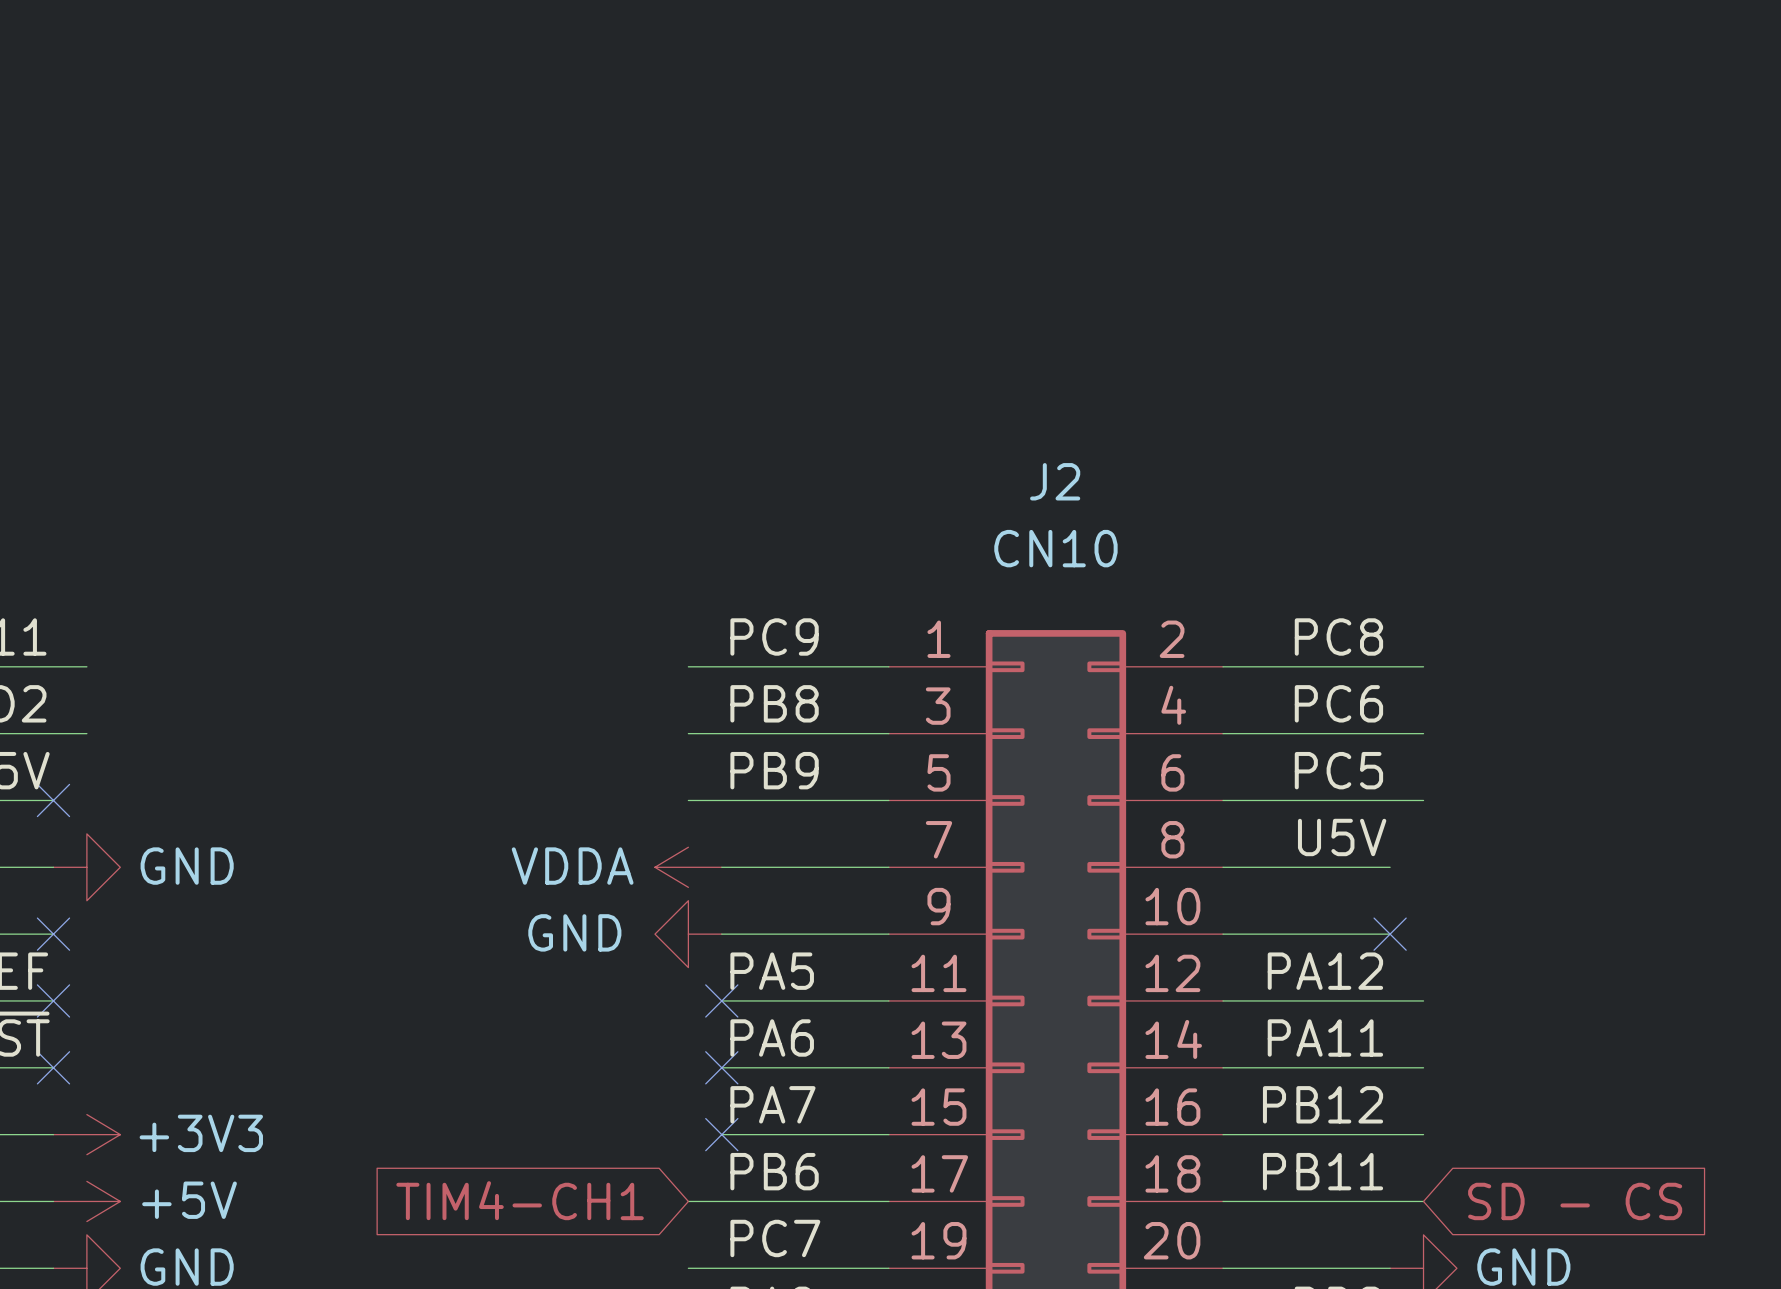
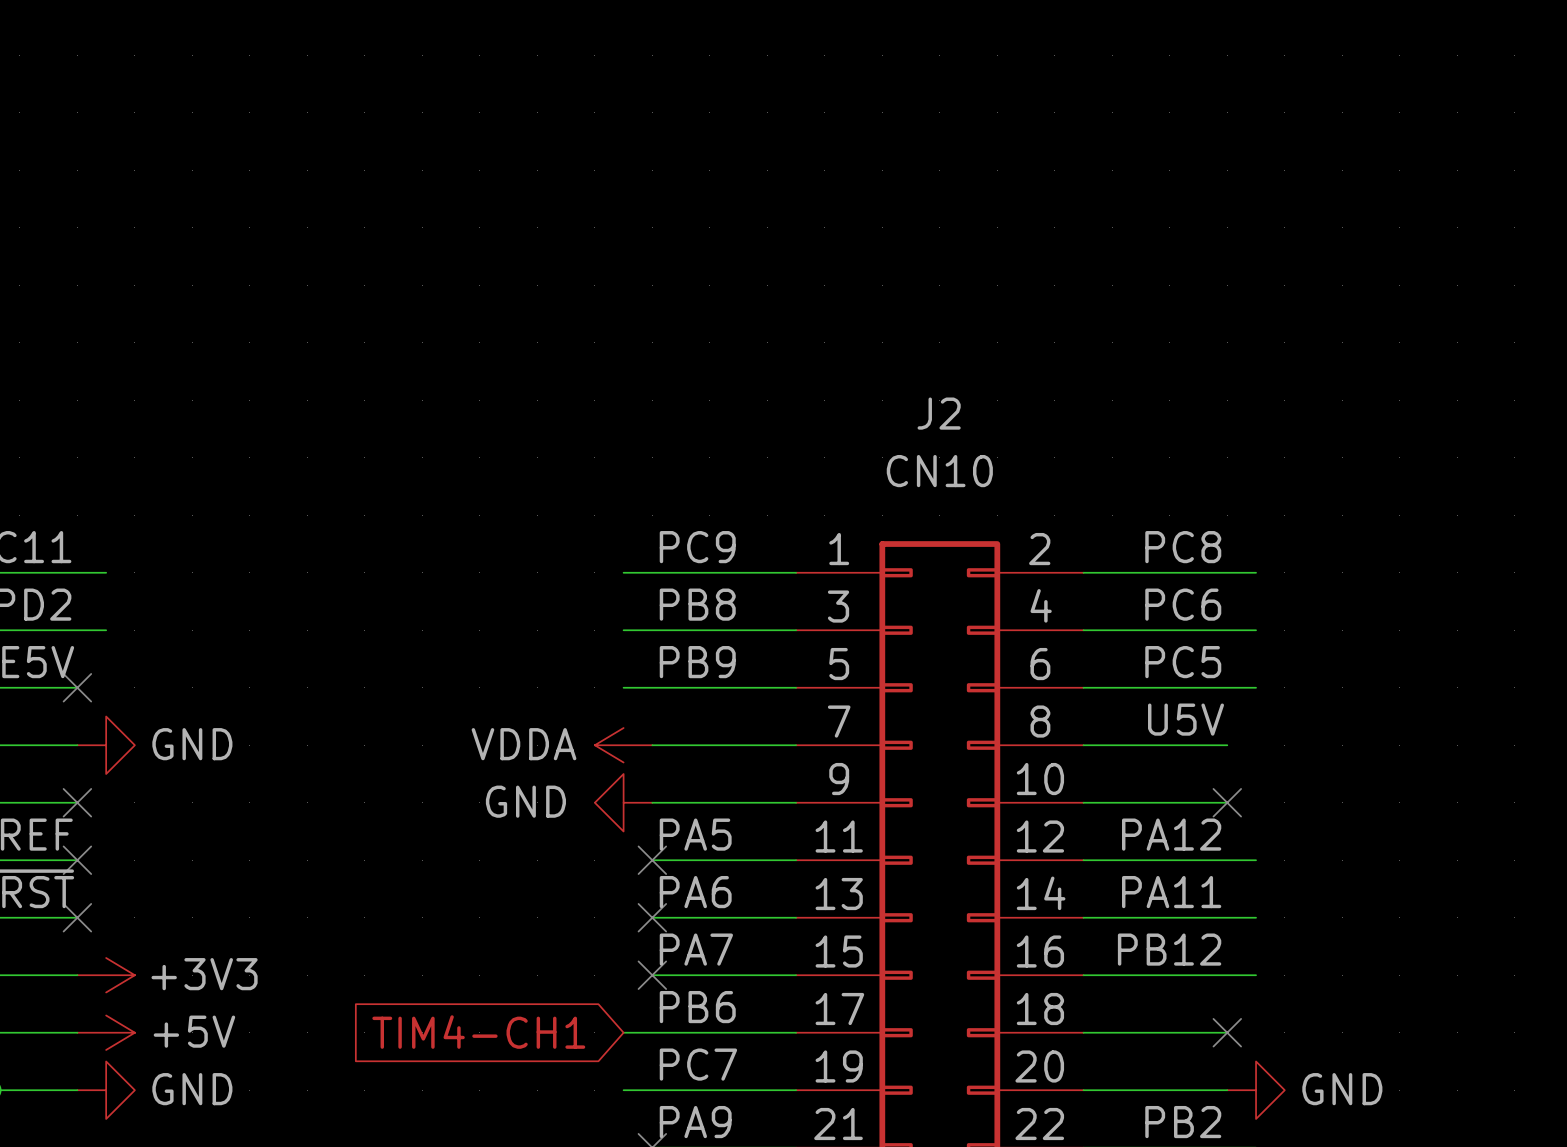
label: PB11 (1323, 1171) -> none
wire: (1390, 1201) (1423, 1201) -> none
no-connect mark: none -> (1227, 1032)
global label: SD - CS (1575, 1201) -> none

